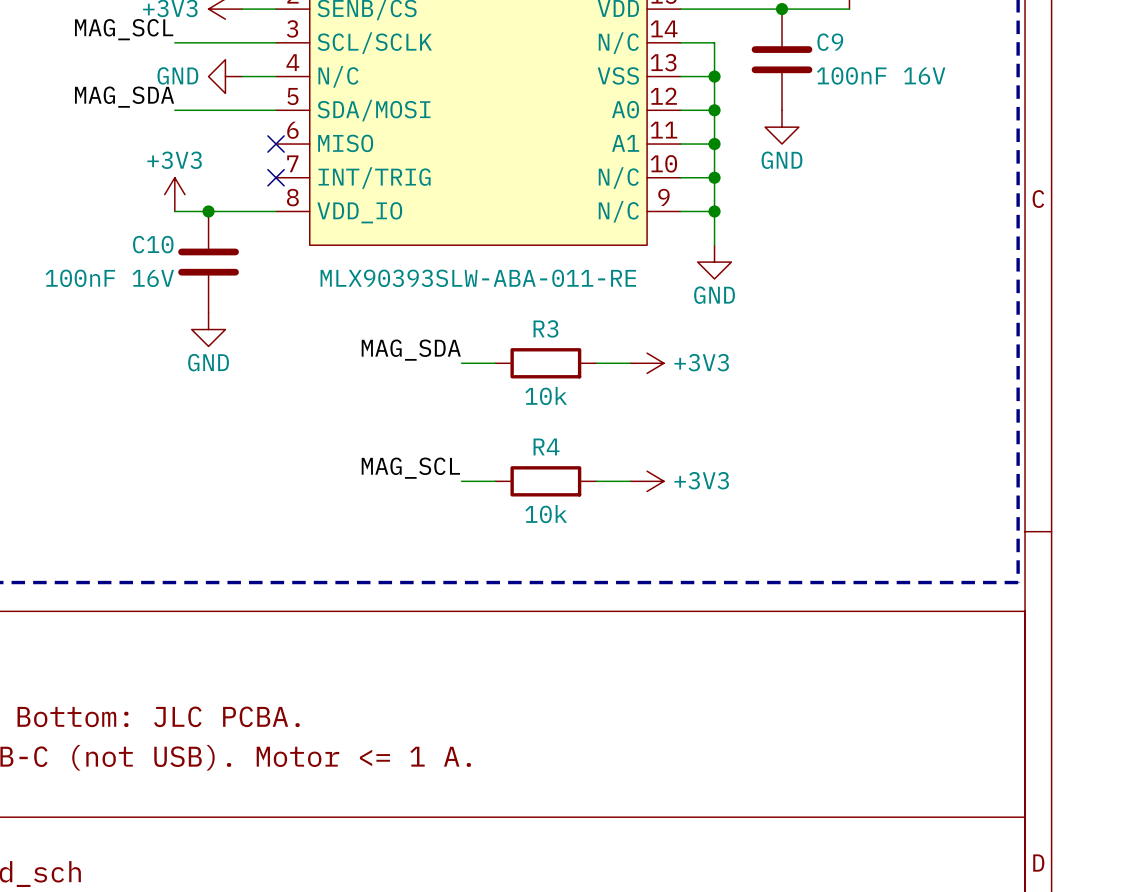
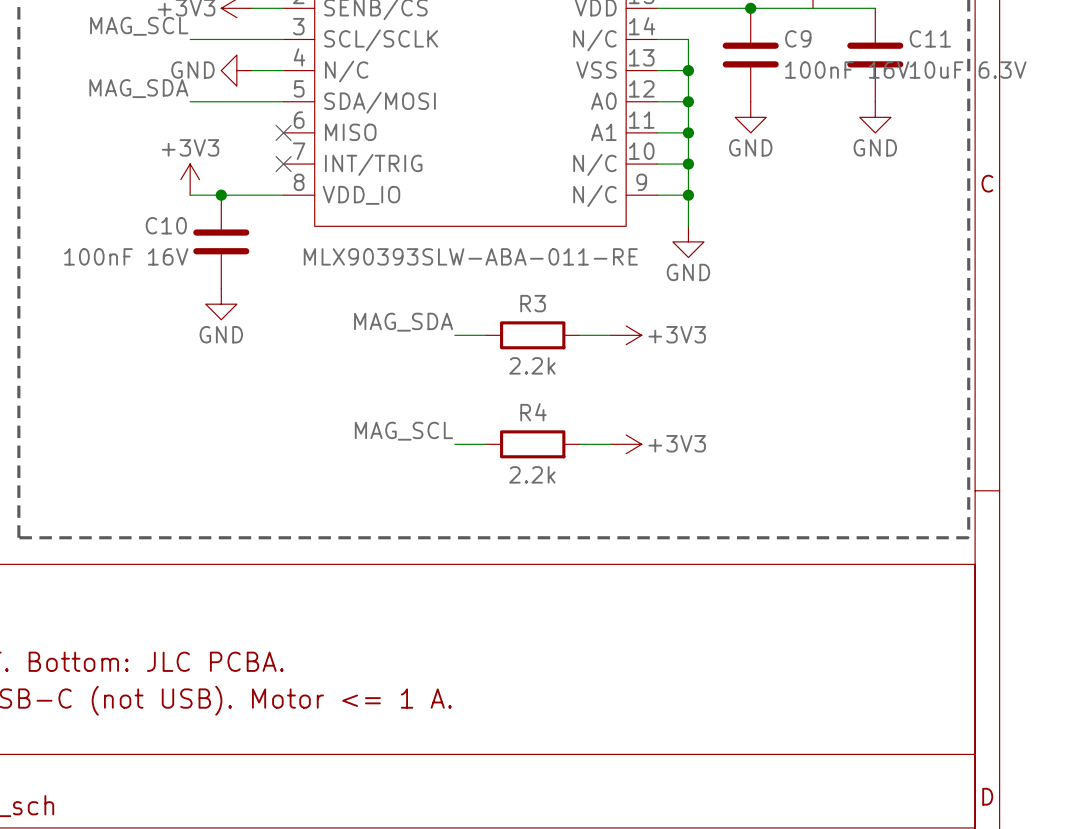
wire: none -> (813, 8) (875, 8)
C11: none -> 10uF 6.3V (875, 55)
power symbol: none -> GND (875, 117)
R3 value: 10k (546, 396) -> 2.2k (532, 365)
R4 value: 10k (546, 514) -> 2.2k (532, 474)

